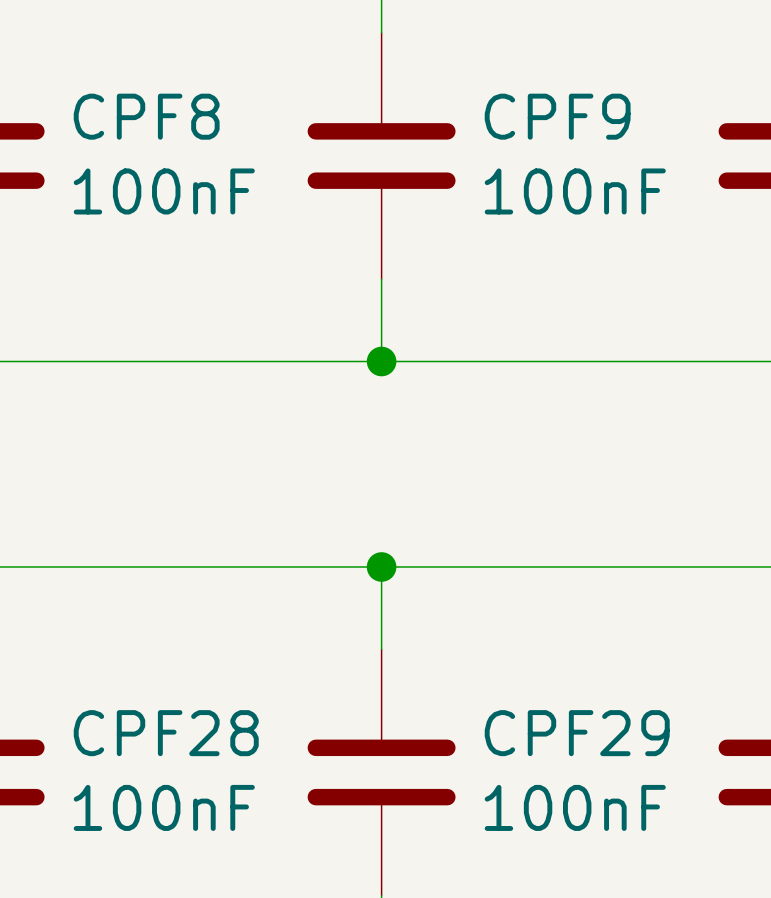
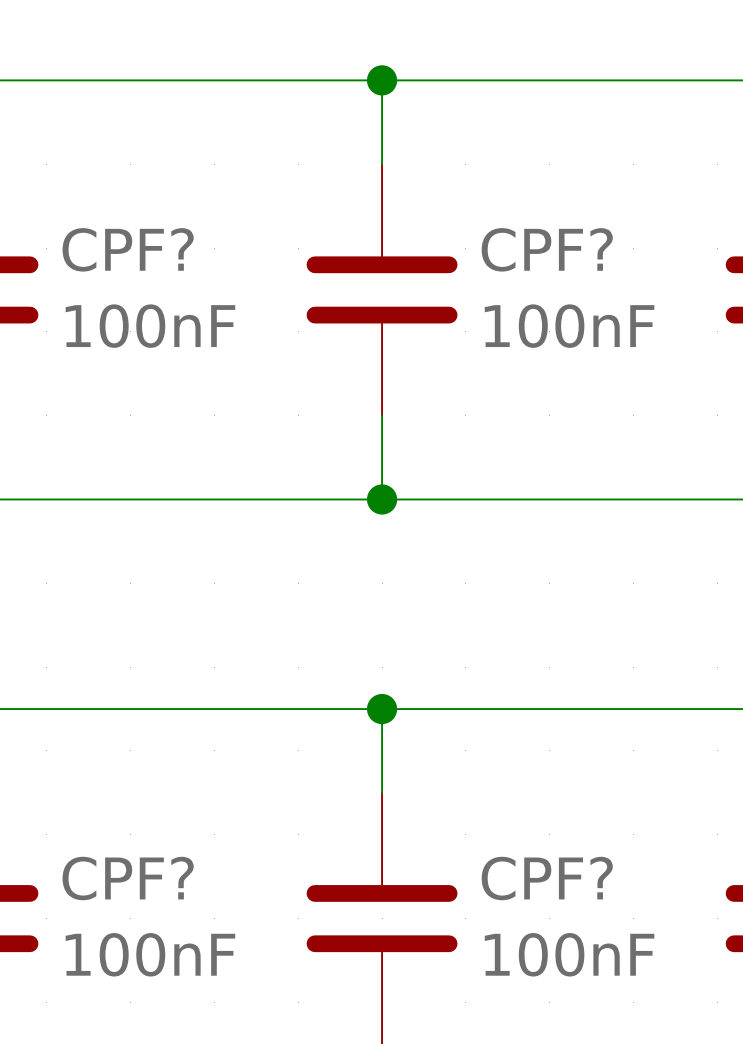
CPF8 name: CPF8 (146, 116) -> CPF? (128, 249)
CPF9 name: CPF9 (557, 116) -> CPF? (547, 249)
CPF28 name: CPF28 (166, 733) -> CPF? (128, 878)
CPF29 name: CPF29 (577, 733) -> CPF? (547, 878)

